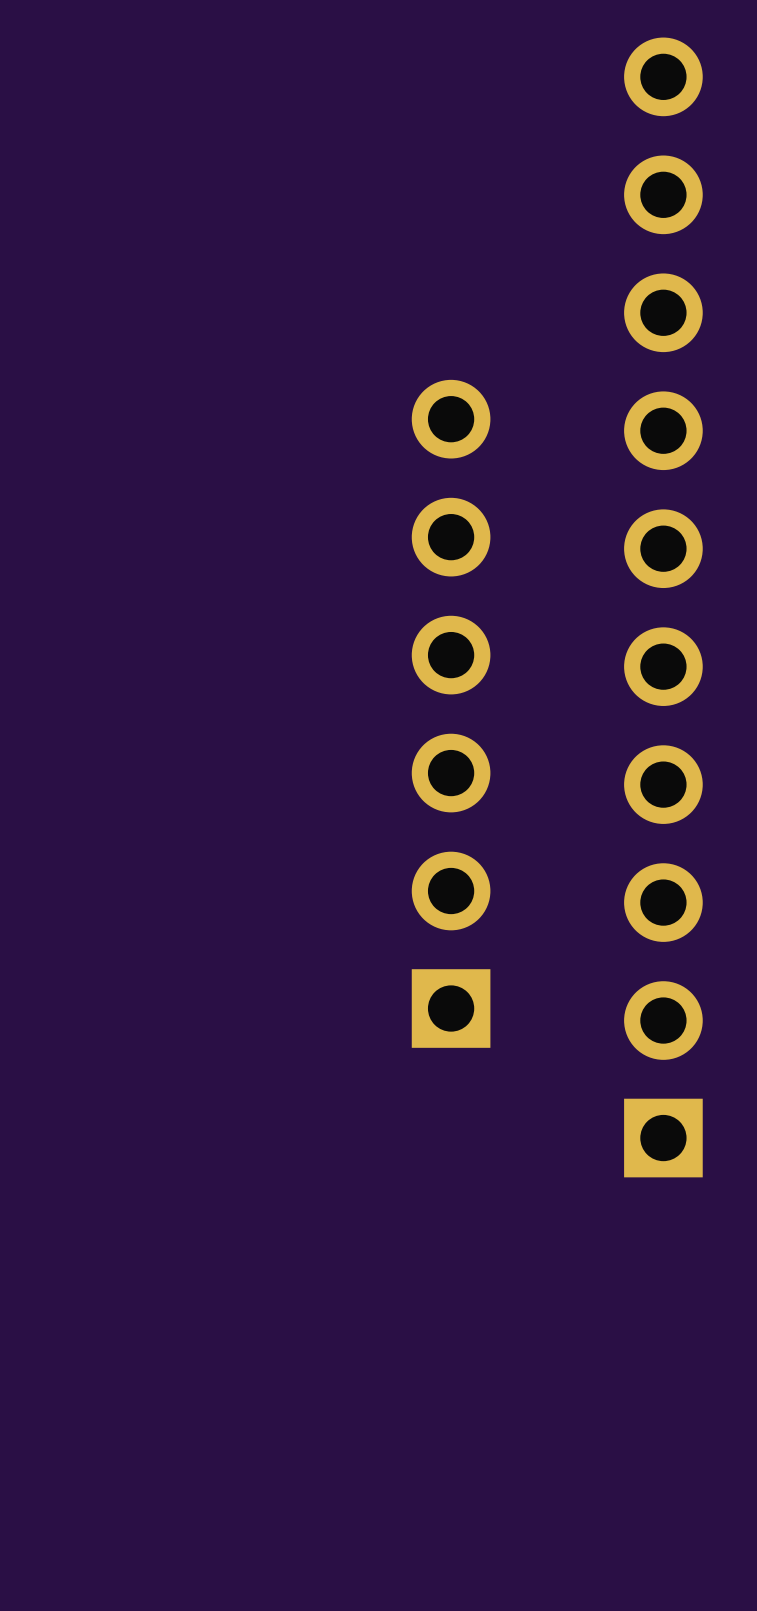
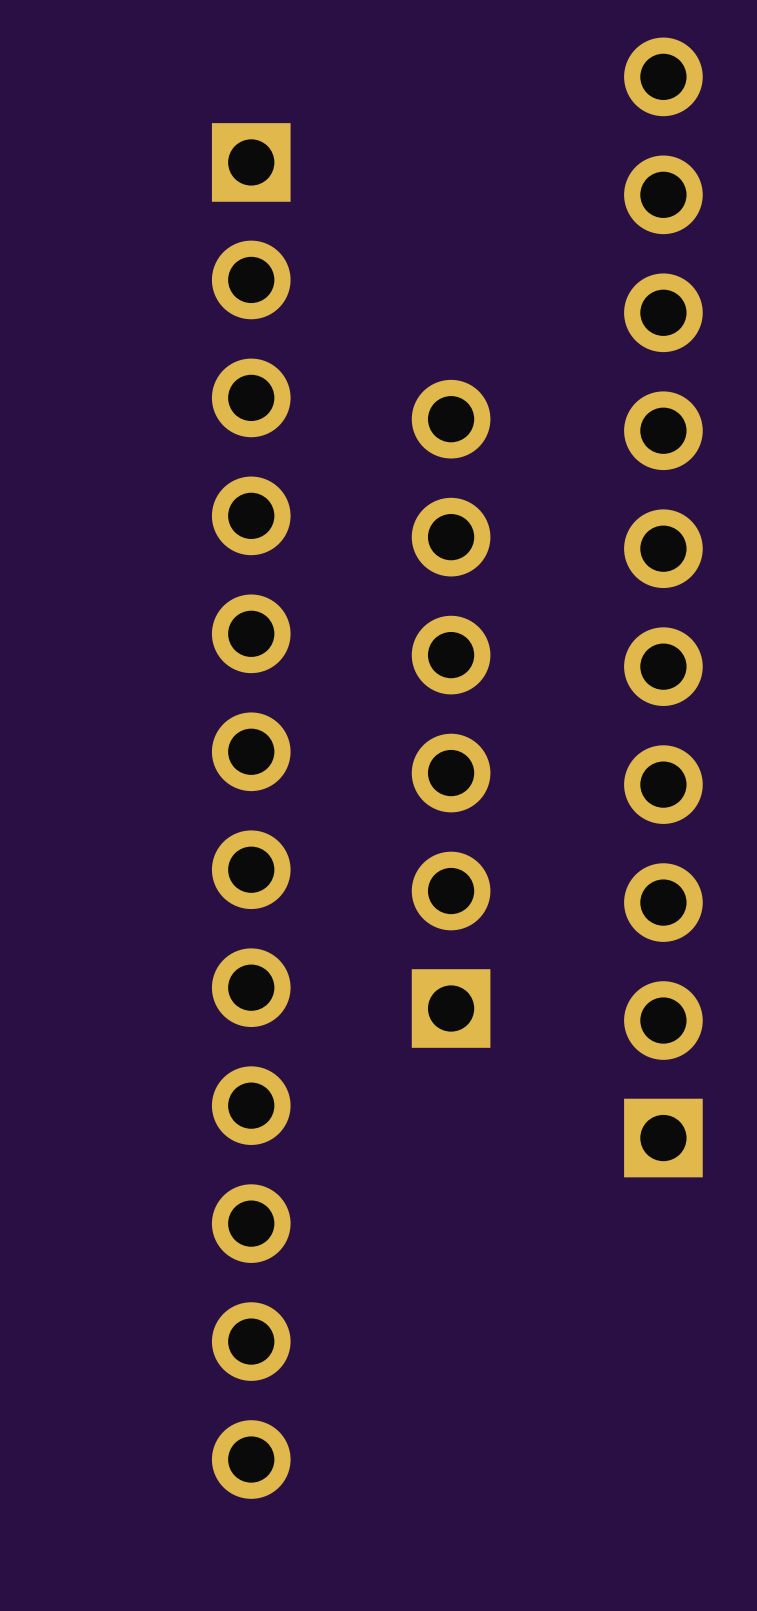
part: none -> (251, 810)

